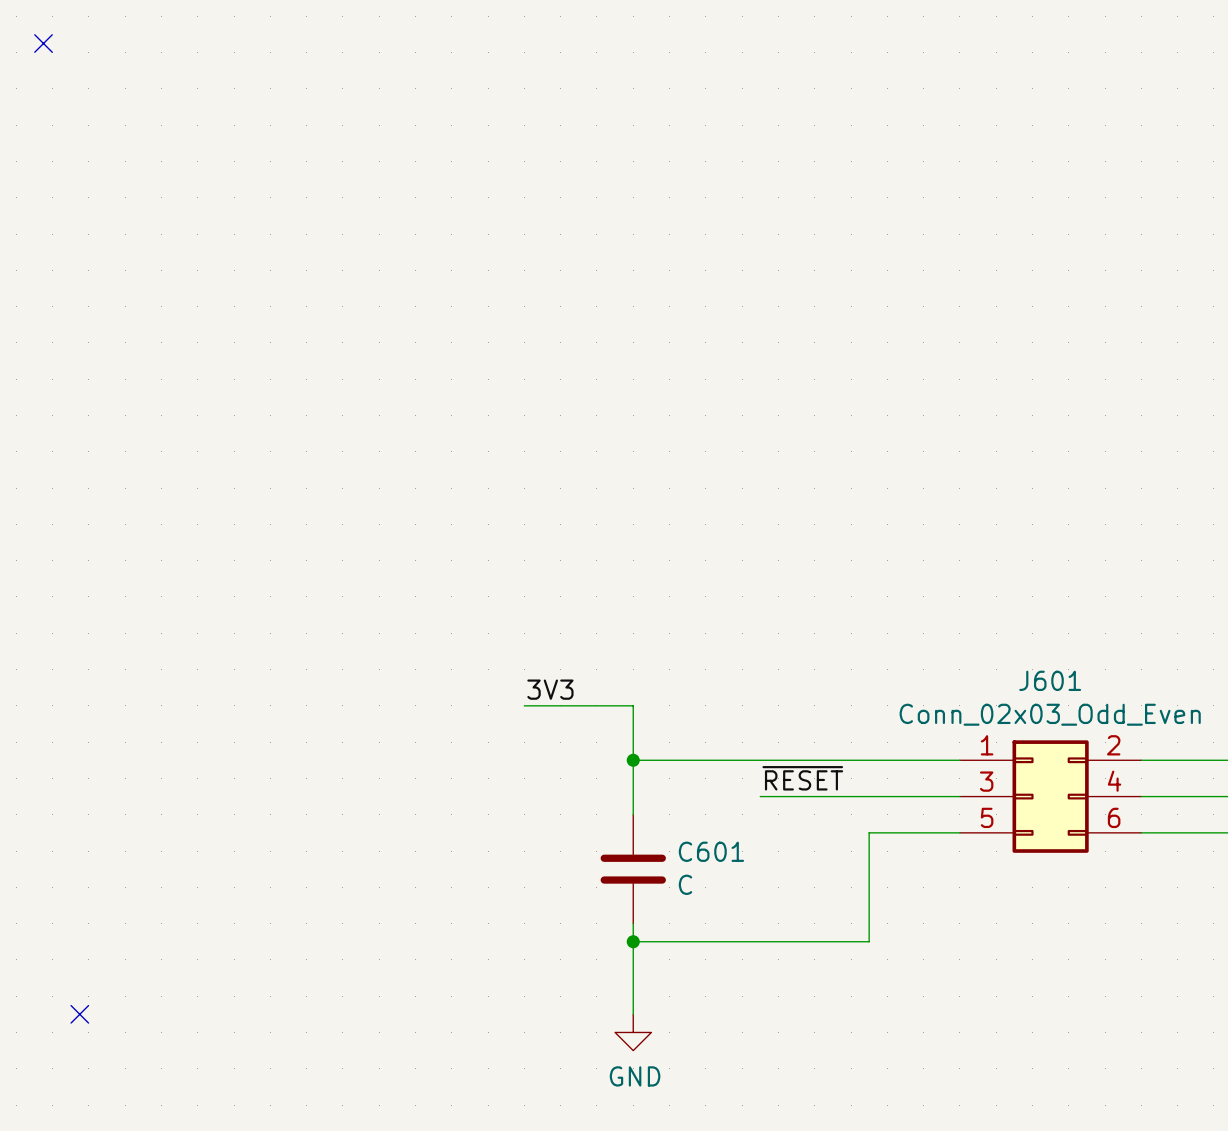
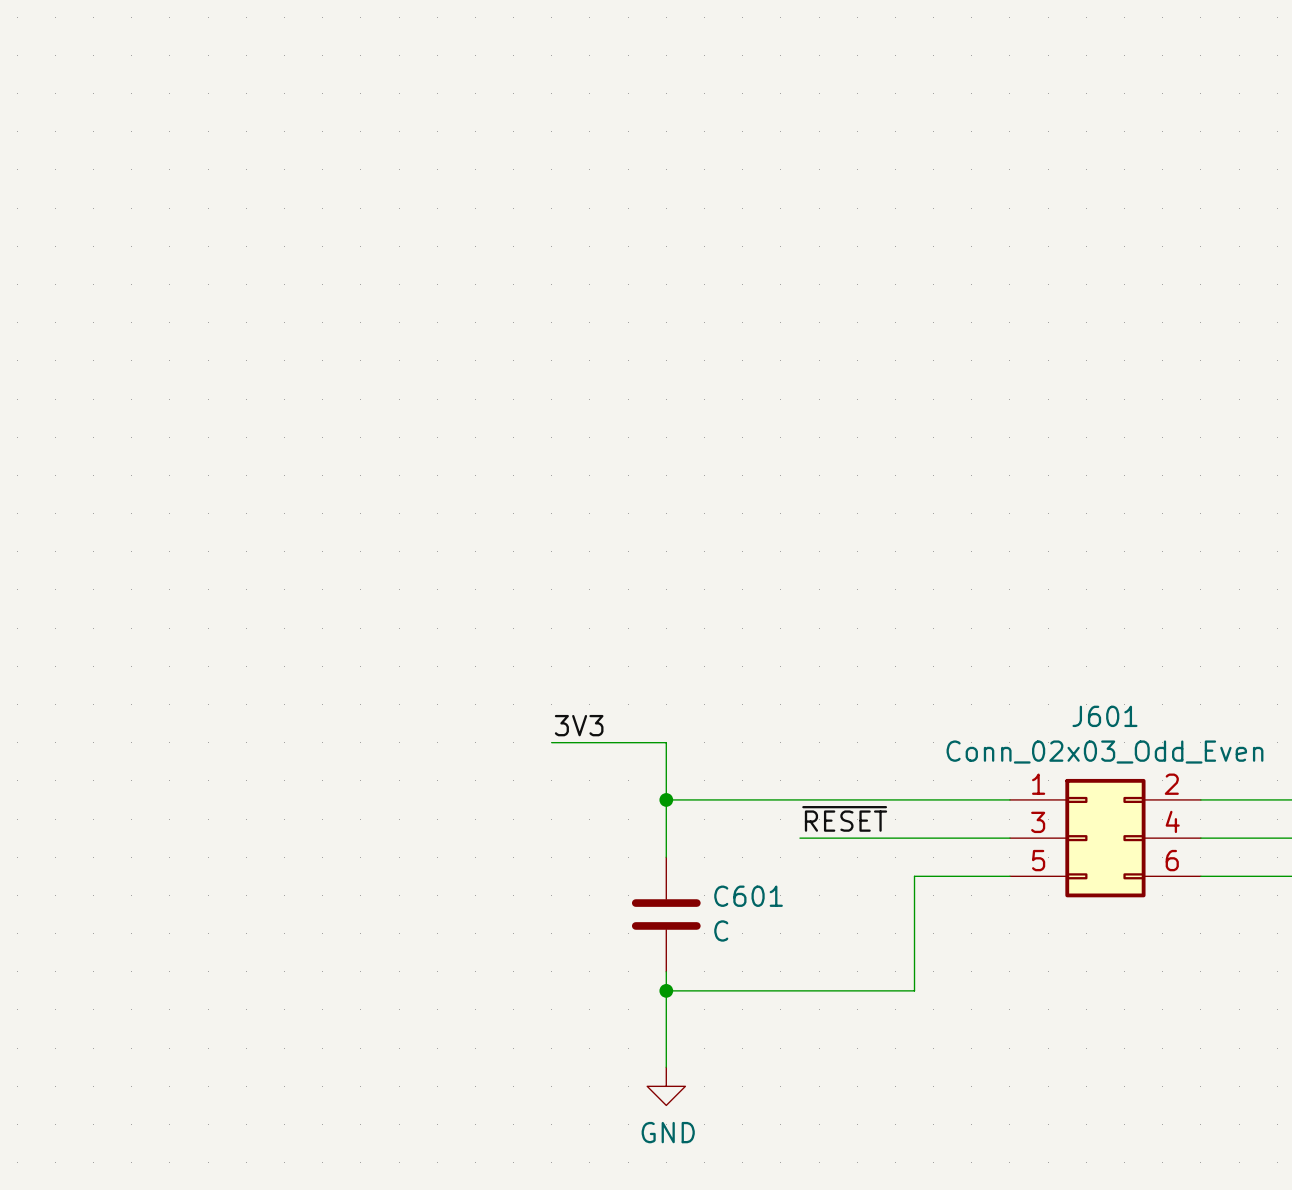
no-connect mark: (43, 43) -> none
no-connect mark: (79, 1014) -> none

